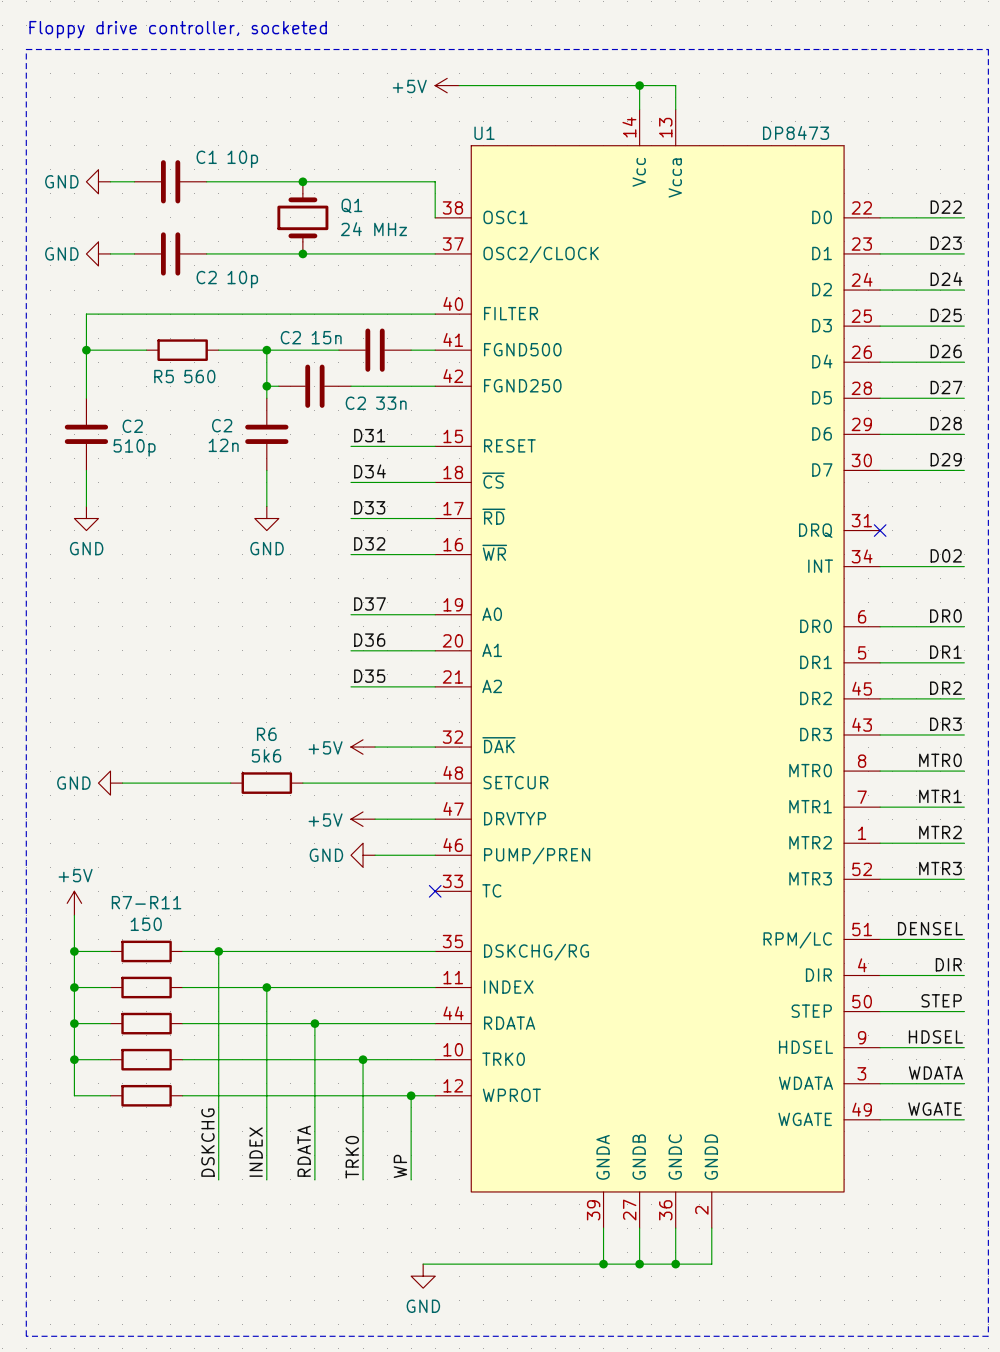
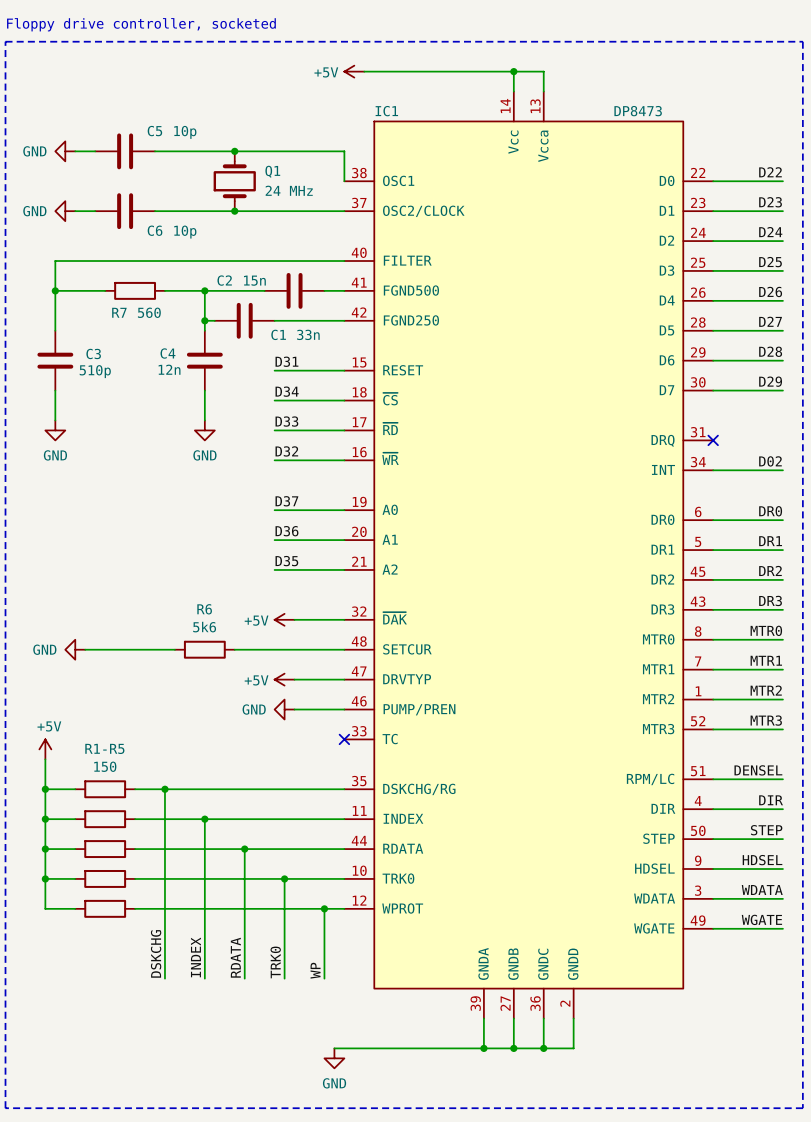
U1 name: U1 (484, 133) -> IC1 (386, 111)
C1 name: C1 (206, 157) -> C5 (154, 131)
C2 name: C2 (206, 277) -> C6 (155, 230)
R5 name: R5 (164, 376) -> R7 (119, 312)
C2 name: C2 (355, 403) -> C1 (278, 334)
C2 name: C2 (222, 425) -> C4 (167, 353)
C2 name: C2 (132, 426) -> C3 (93, 353)
R7-R11 name: R7-R11 (146, 902) -> R1-R5 (104, 748)

